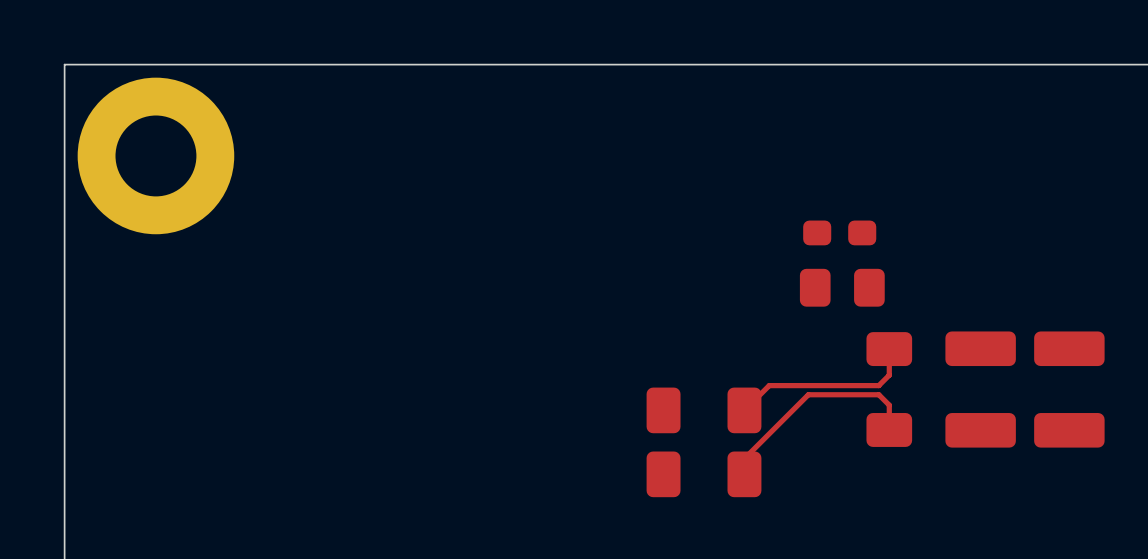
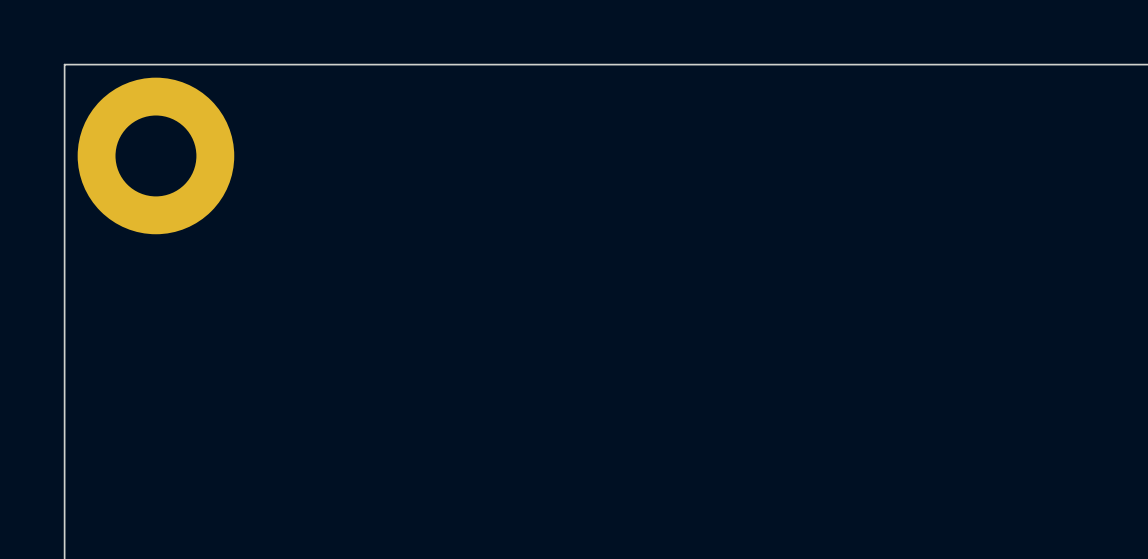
part: (839, 232) -> none
part: (842, 287) -> none
top track: (889, 349) (889, 375) (878, 385) (769, 385) (744, 410) -> none
part: (889, 389) -> none
part: (980, 389) -> none
part: (1069, 389) -> none
part: (704, 410) -> none
top track: (889, 429) (889, 405) (878, 394) (808, 394) (744, 458) (744, 474) -> none
part: (704, 474) -> none

